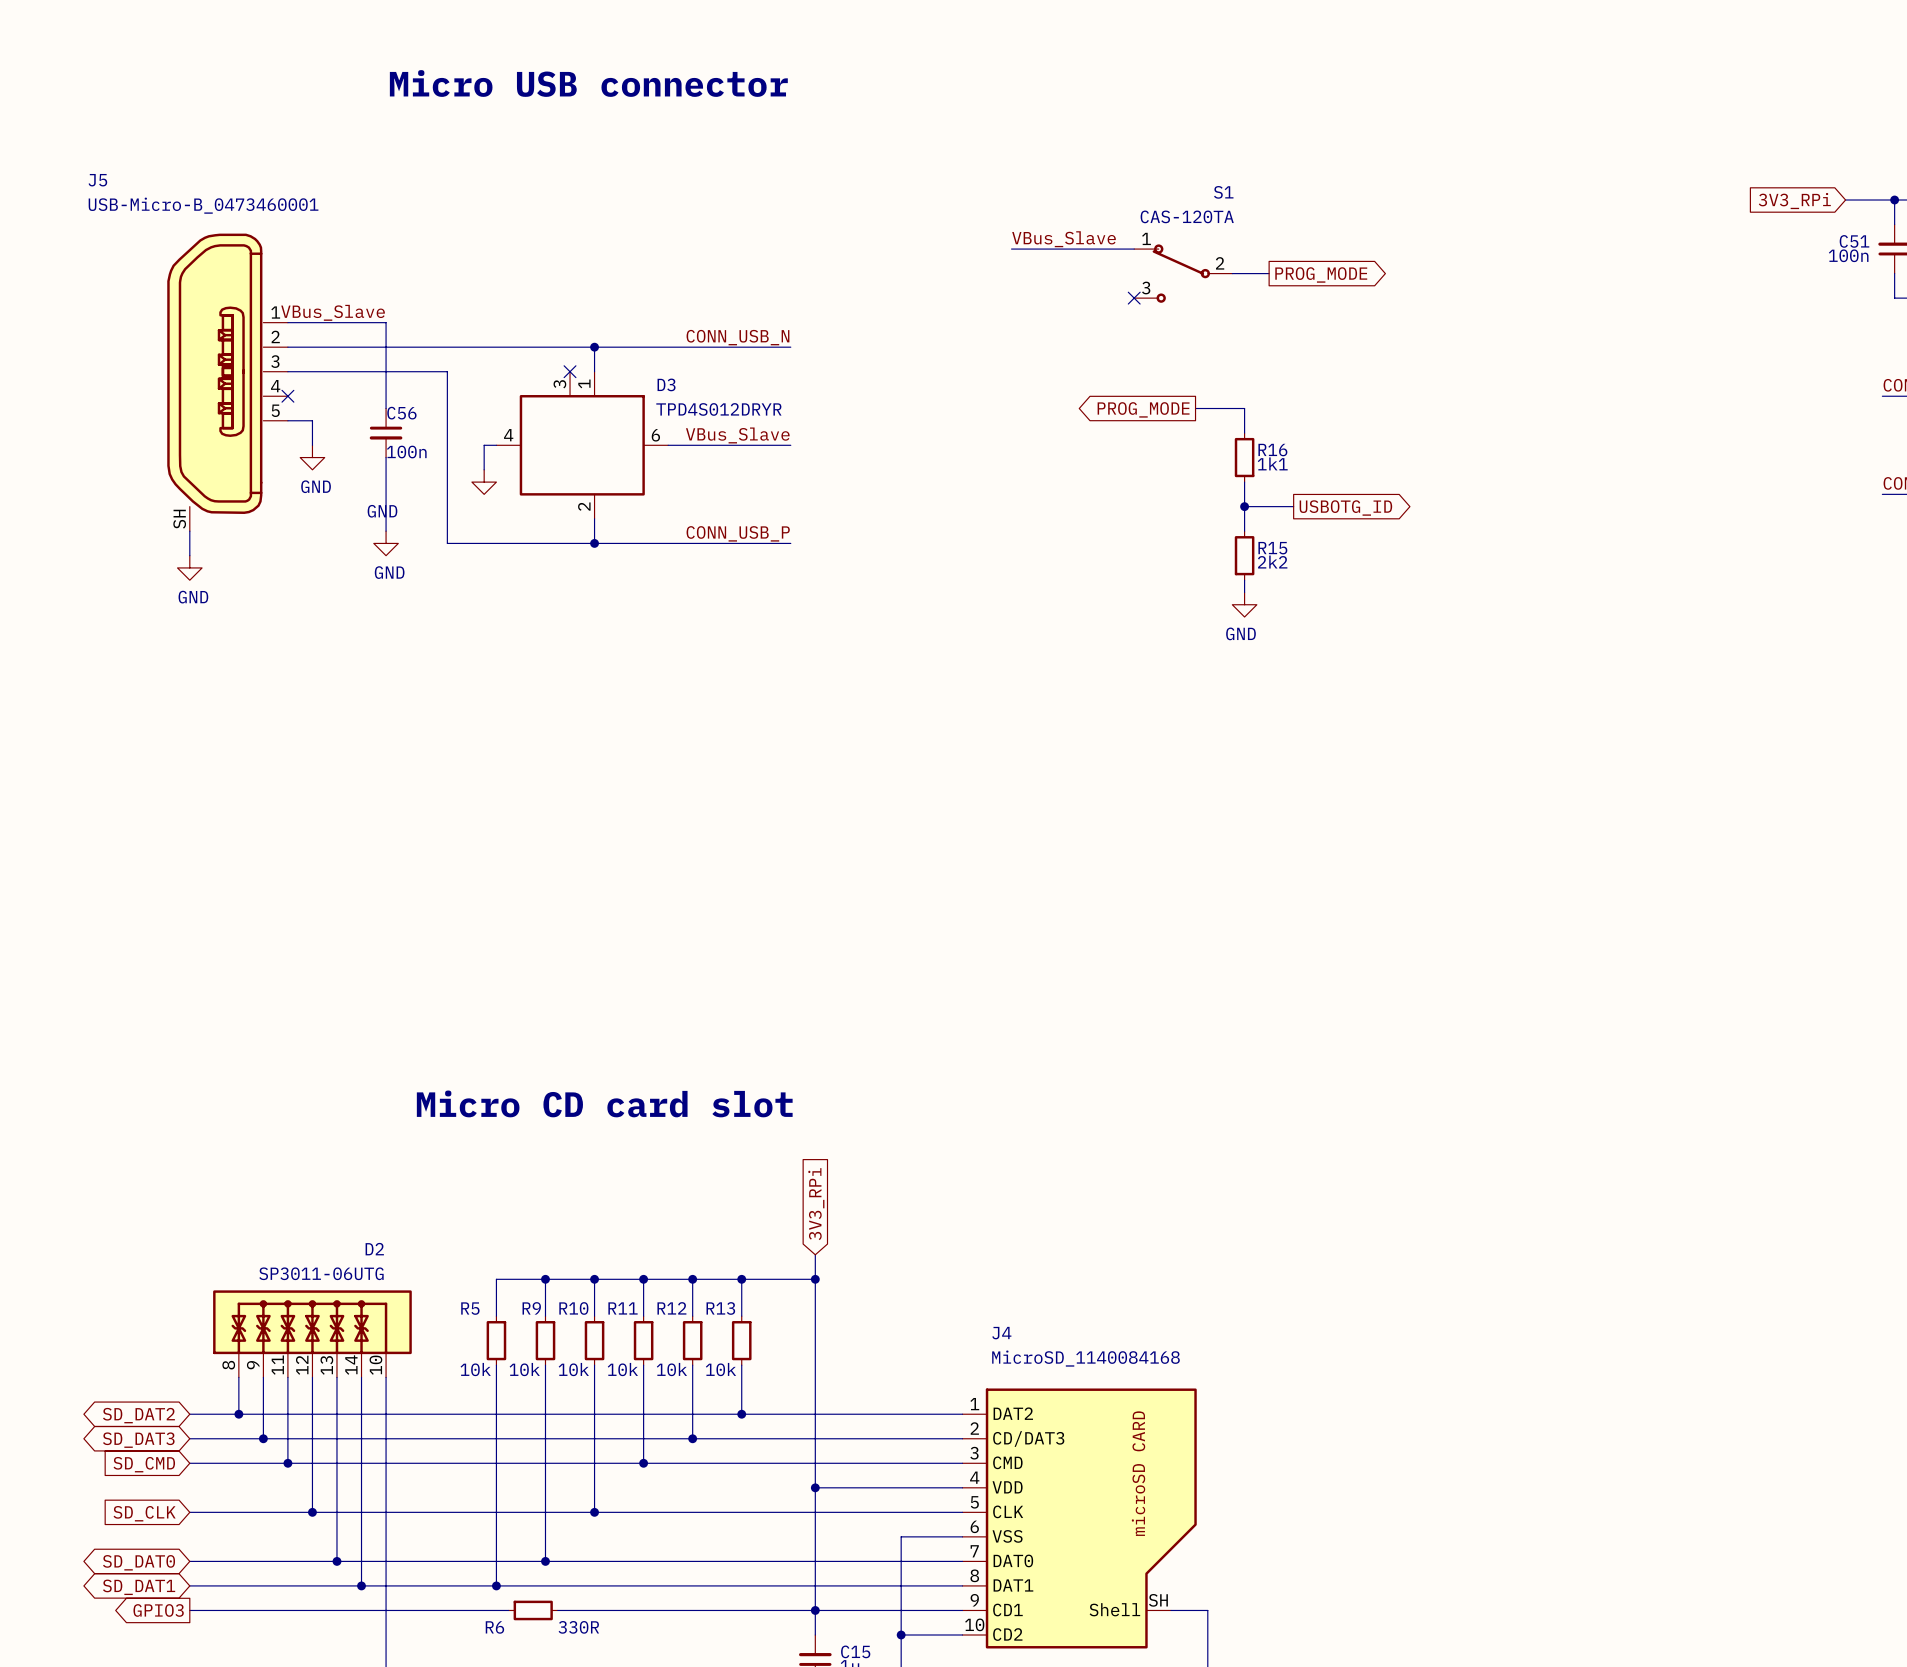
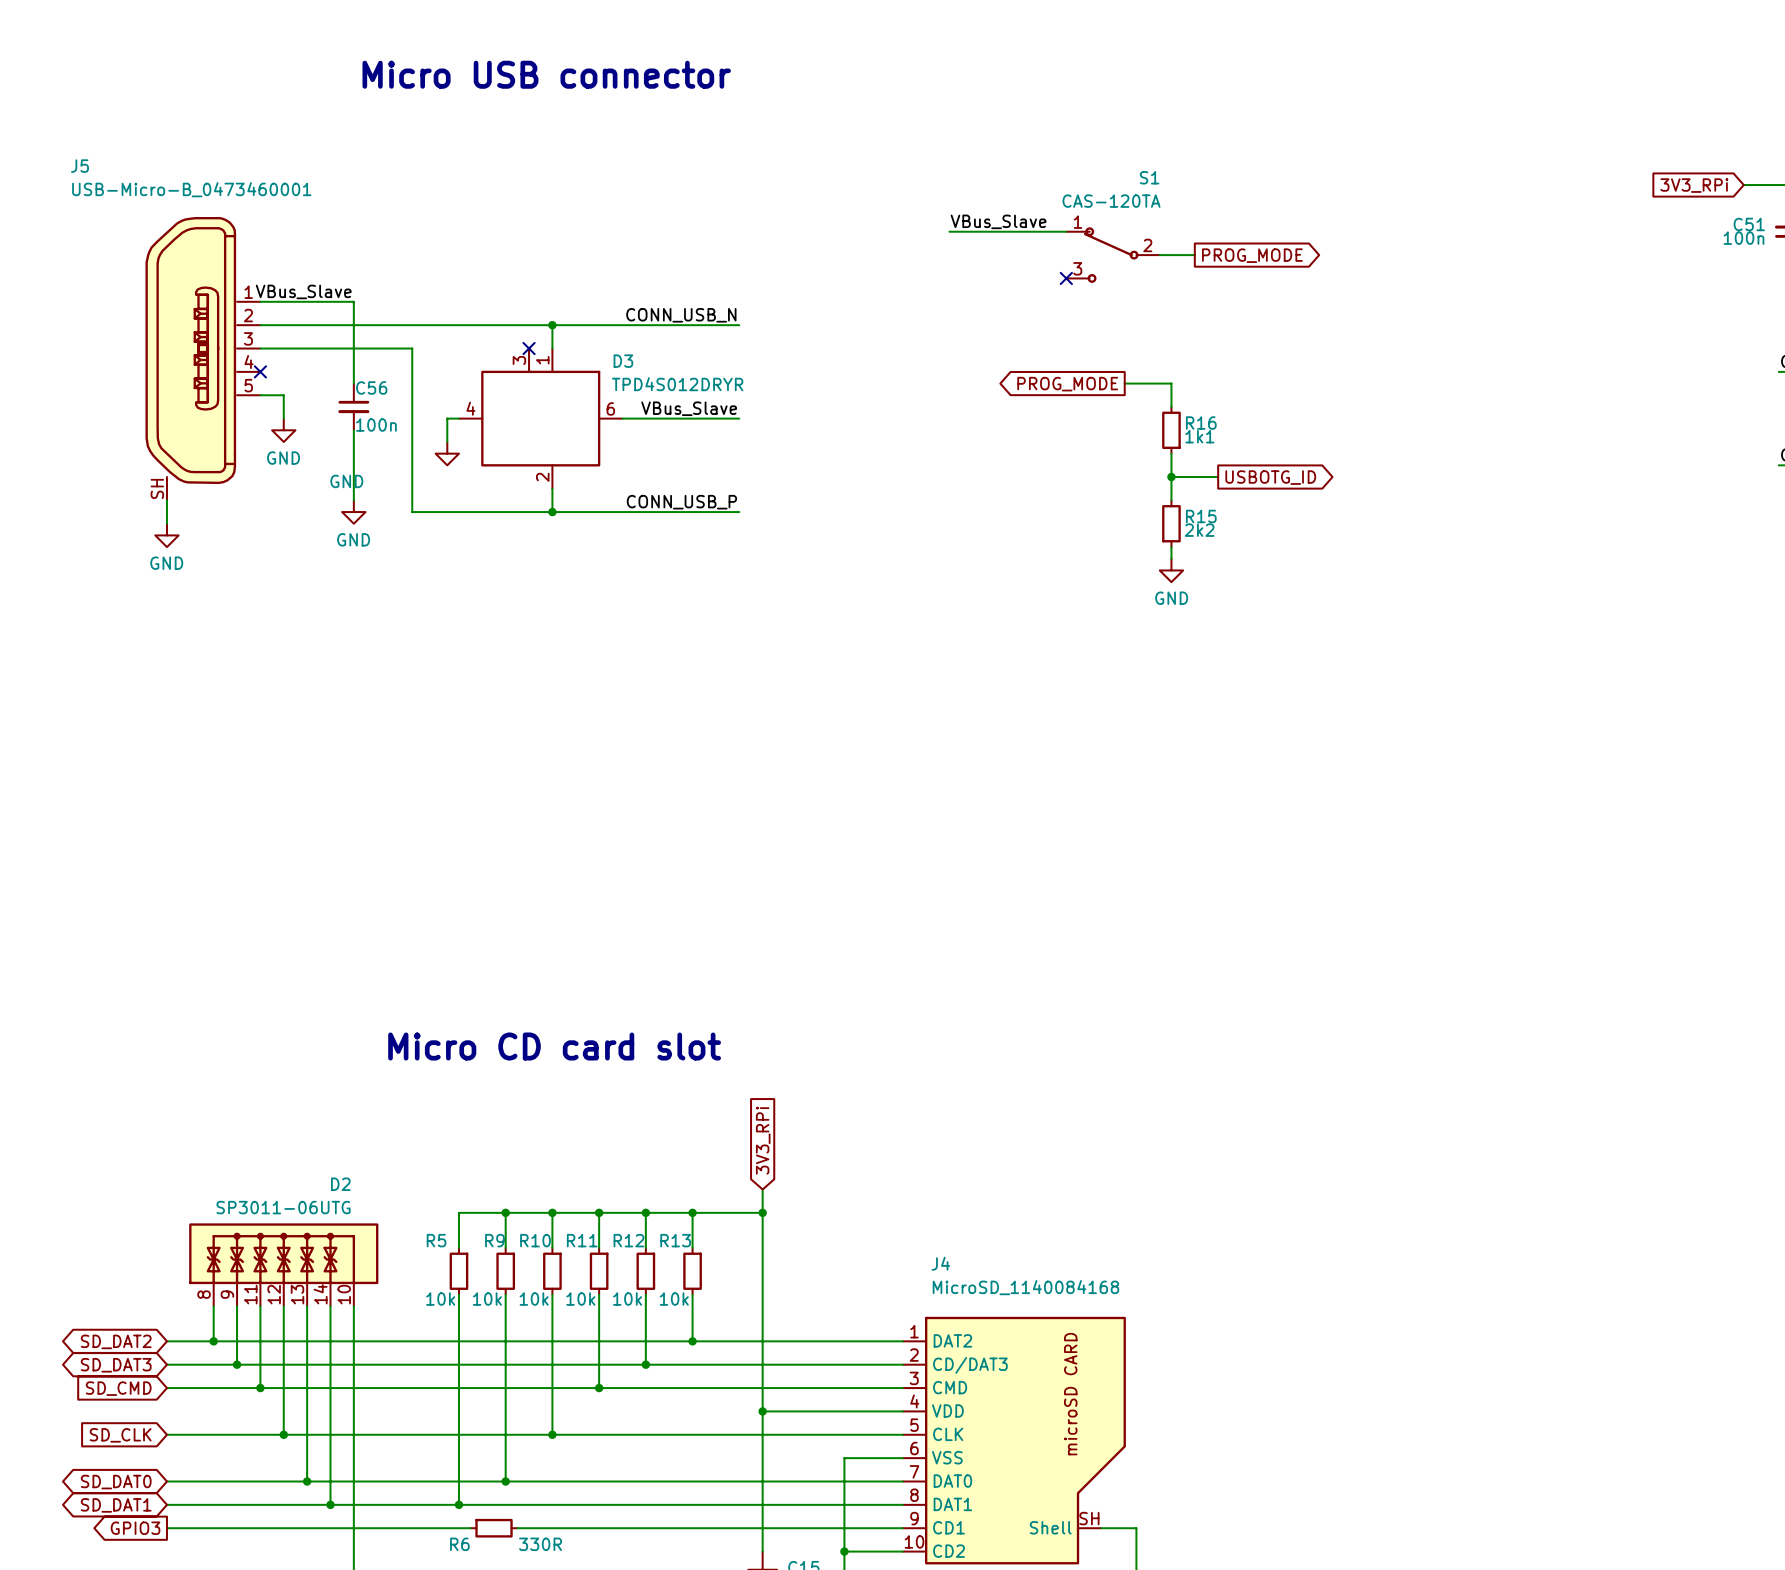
junction: (815, 1610) -> none

